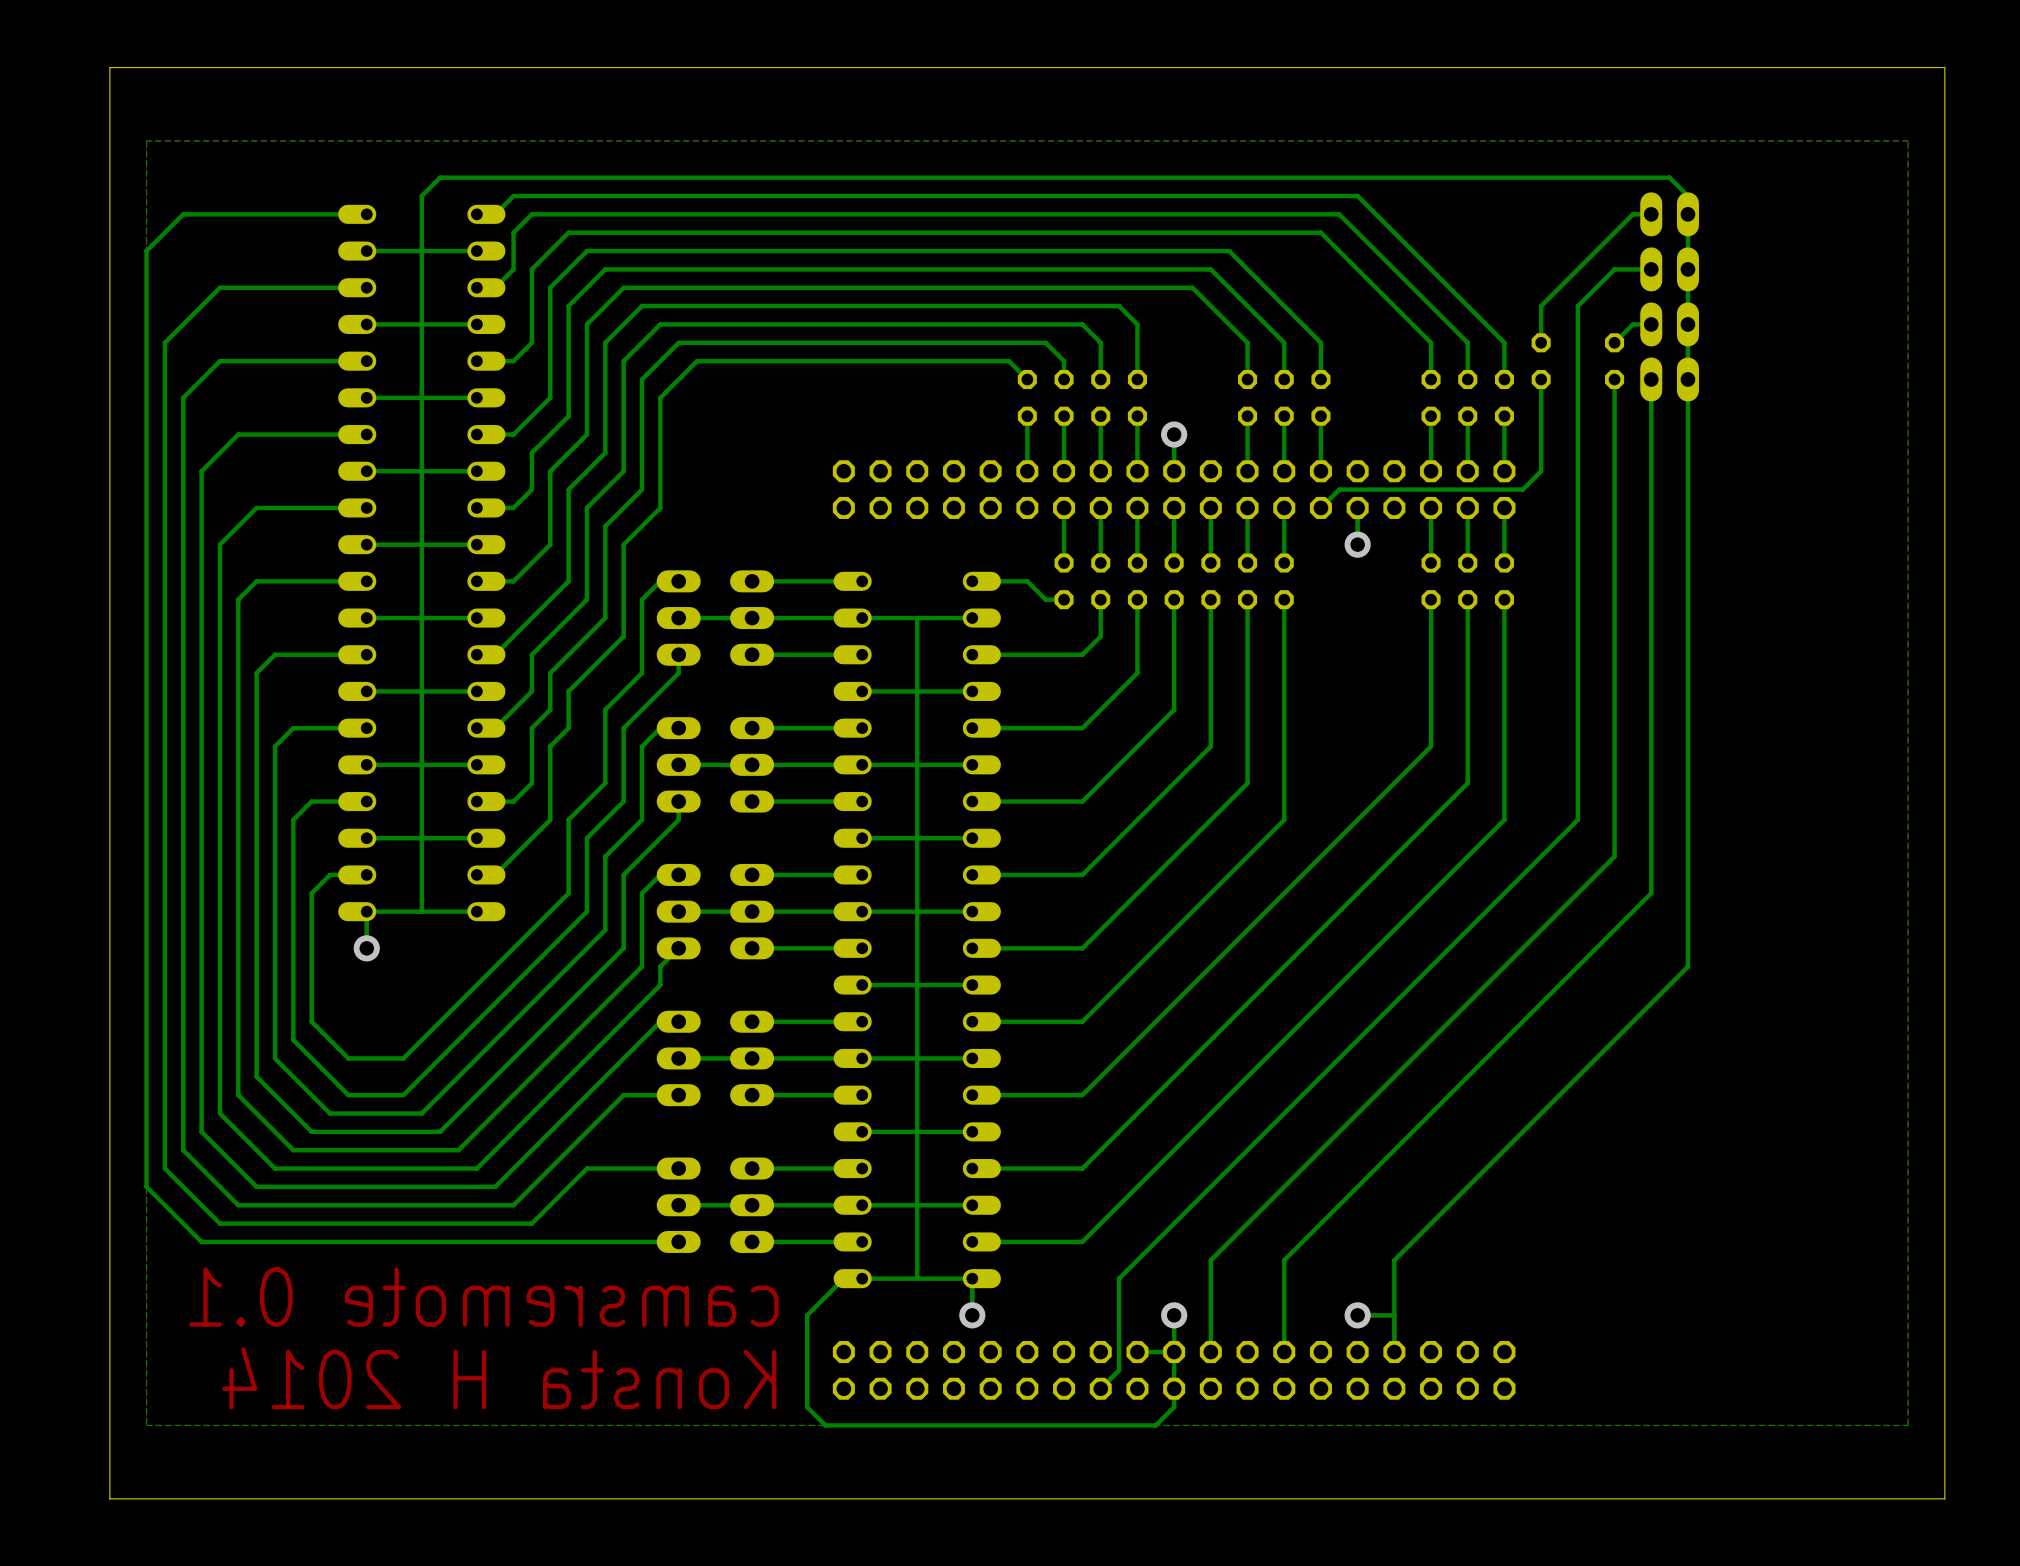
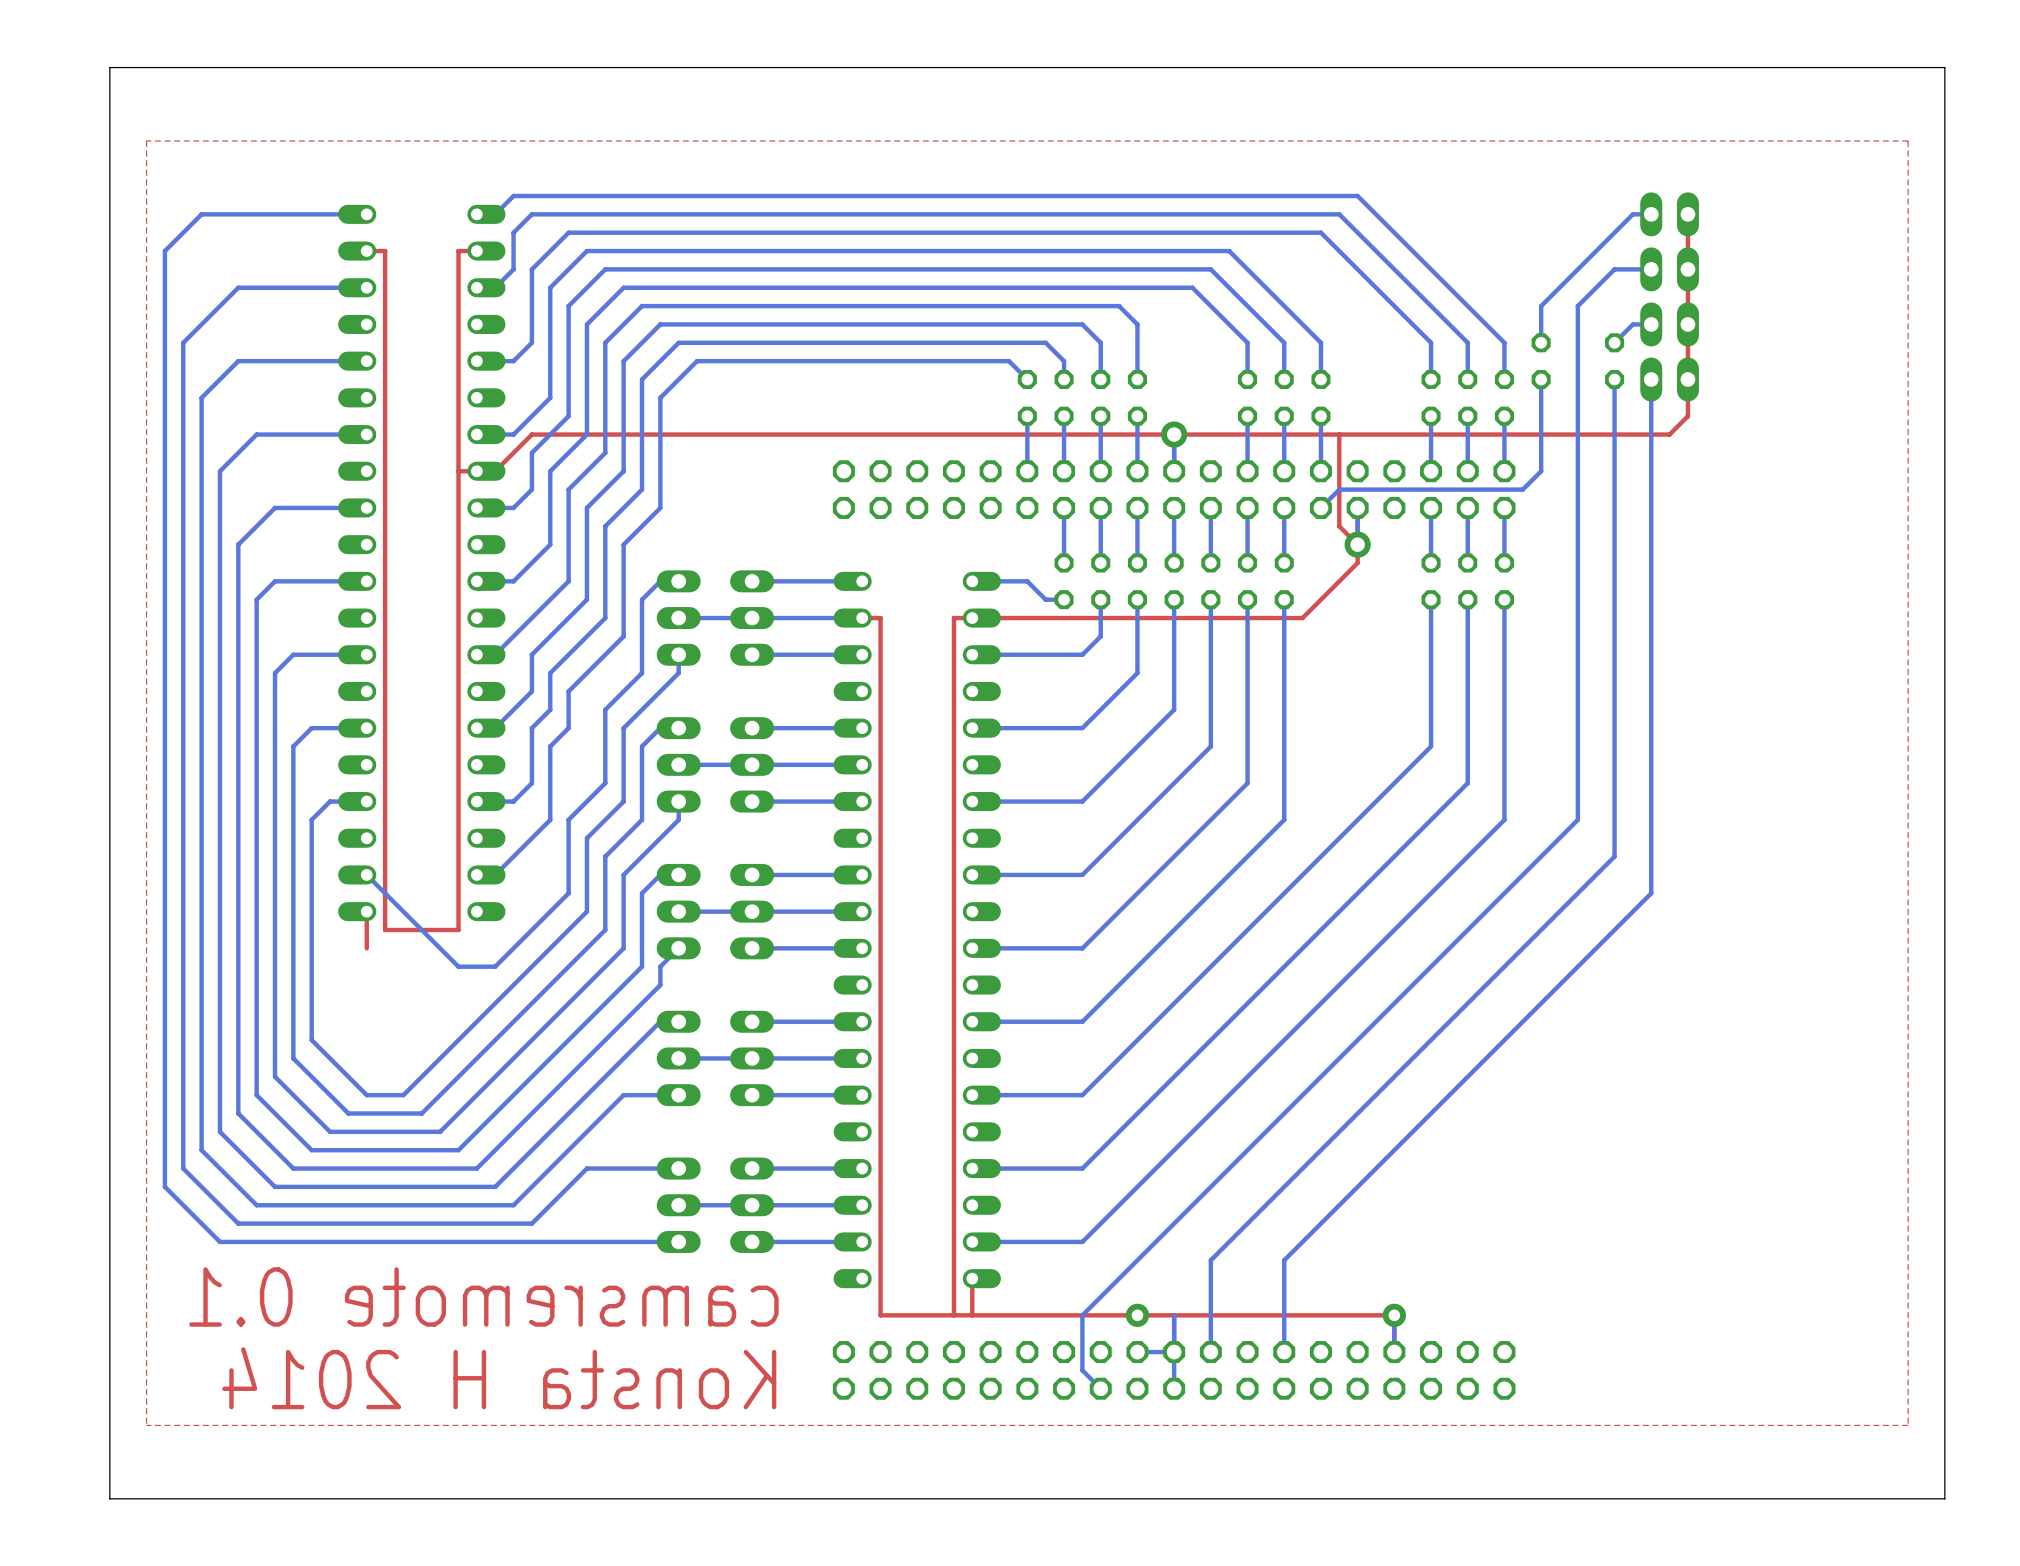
bottom zone outline: (1908, 140) (146, 140) (146, 1425) (1908, 1425) (1908, 140) -> none
bottom track: (201, 214) (183, 214) (146, 251) (146, 1186) (201, 1241) (219, 1241) -> (201, 214) (164, 251) (164, 342)
top track: none -> (1687, 214) (1687, 416) (1669, 434) (531, 434) (495, 471) (458, 471)
bottom track: (476, 251) (366, 251) -> none
top track: none -> (476, 251) (458, 251) (458, 930) (385, 930) (385, 251) (366, 251)
bottom track: (238, 287) (219, 287) (164, 342) -> (238, 287) (183, 342) (183, 397)
bottom track: (476, 324) (366, 324) -> none
bottom track: (238, 361) (219, 361) (183, 397) -> none
bottom track: (476, 397) (366, 397) -> none
bottom track: (256, 434) (238, 434) (201, 471) -> (238, 361) (201, 397) (201, 471)
bottom track: none -> (256, 434) (219, 471) (219, 544)
top track: none -> (1339, 434) (1339, 526) (1357, 544) (1357, 563) (1302, 618) (953, 618) (953, 1315)
bottom track: (476, 471) (366, 471) -> none
bottom track: (275, 507) (256, 507) (219, 544) -> (275, 507) (238, 544) (238, 599)
bottom track: (476, 544) (366, 544) -> none
bottom track: (275, 581) (256, 581) (238, 599) -> (275, 581) (256, 599) (256, 673)
bottom track: (476, 618) (366, 618) -> none
top track: none -> (862, 618) (880, 618) (880, 1315) (1357, 1315)
bottom track: (917, 618) (917, 1278) -> none
bottom track: (972, 618) (862, 618) -> none
bottom track: (293, 654) (275, 654) (256, 673) -> none
bottom track: (476, 691) (366, 691) -> none
bottom track: (972, 691) (862, 691) -> none
bottom track: (311, 728) (293, 728) (275, 746) -> (293, 654) (275, 673) (275, 746)
bottom track: none -> (311, 728) (293, 746) (293, 819)
bottom track: (476, 764) (366, 764) -> none
bottom track: (972, 764) (862, 764) -> none
bottom track: (330, 801) (311, 801) (293, 819) -> (330, 801) (311, 819) (311, 893)
bottom track: (476, 838) (366, 838) -> none
bottom track: (972, 838) (862, 838) -> none
bottom track: (366, 874) (330, 874) (311, 893) -> none
bottom track: (421, 911) (421, 196) (440, 177) (1669, 177) (1687, 196) (1687, 966) (1394, 1260) (1394, 1315) (1357, 1315) -> none
bottom track: (476, 911) (366, 911) (366, 948) -> none
bottom track: (972, 911) (862, 911) -> none
via: (366, 948) -> none
bottom track: (495, 966) (403, 1058) (348, 1058) (311, 1021) -> (495, 966) (458, 966) (366, 874)
bottom track: (972, 985) (862, 985) -> none
bottom track: (293, 1040) (348, 1095) (366, 1095) -> (311, 1021) (311, 1040) (366, 1095)
bottom track: (275, 1058) (330, 1113) (348, 1113) -> (293, 1040) (293, 1058) (348, 1113)
bottom track: (972, 1058) (862, 1058) -> none
bottom track: (256, 1076) (311, 1131) (330, 1131) -> (275, 1058) (275, 1076) (330, 1131)
bottom track: (238, 1095) (293, 1150) (311, 1150) -> (256, 1076) (256, 1095) (311, 1150)
bottom track: (219, 1113) (275, 1168) (293, 1168) -> (238, 1095) (238, 1113) (293, 1168)
bottom track: (201, 1131) (256, 1186) (275, 1186) -> (219, 1113) (219, 1131) (275, 1186)
bottom track: none -> (201, 1131) (201, 1150) (256, 1205)
bottom track: (972, 1131) (862, 1131) -> none
bottom track: (183, 1150) (238, 1205) (256, 1205) -> (183, 1150) (183, 1168) (238, 1223)
bottom track: (164, 1168) (219, 1223) (238, 1223) -> (164, 1168) (164, 1186) (219, 1241)
bottom track: (972, 1205) (862, 1205) -> none
bottom track: (1119, 1278) (1119, 1370) (1100, 1388) -> (1119, 1278) (1082, 1315) (1082, 1370) (1100, 1388)
bottom track: (972, 1315) (972, 1278) (843, 1278) (807, 1315) (807, 1407) (825, 1425) (1155, 1425) (1174, 1407) (1174, 1388) -> none
via: (972, 1315) -> none
via: none -> (1137, 1315)
via: (1174, 1315) -> none
via: (1357, 1315) -> none
via: none -> (1394, 1315)

